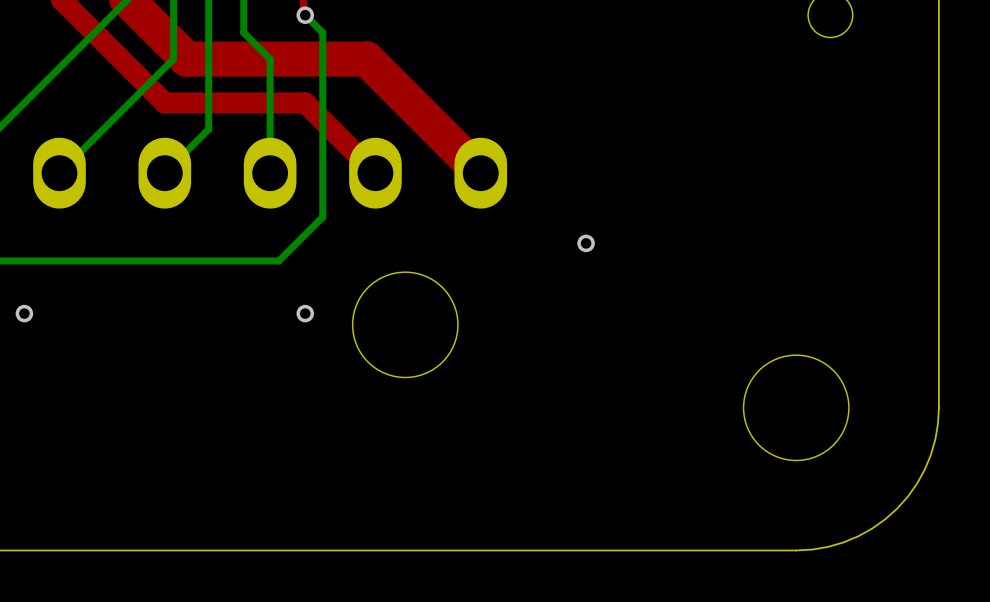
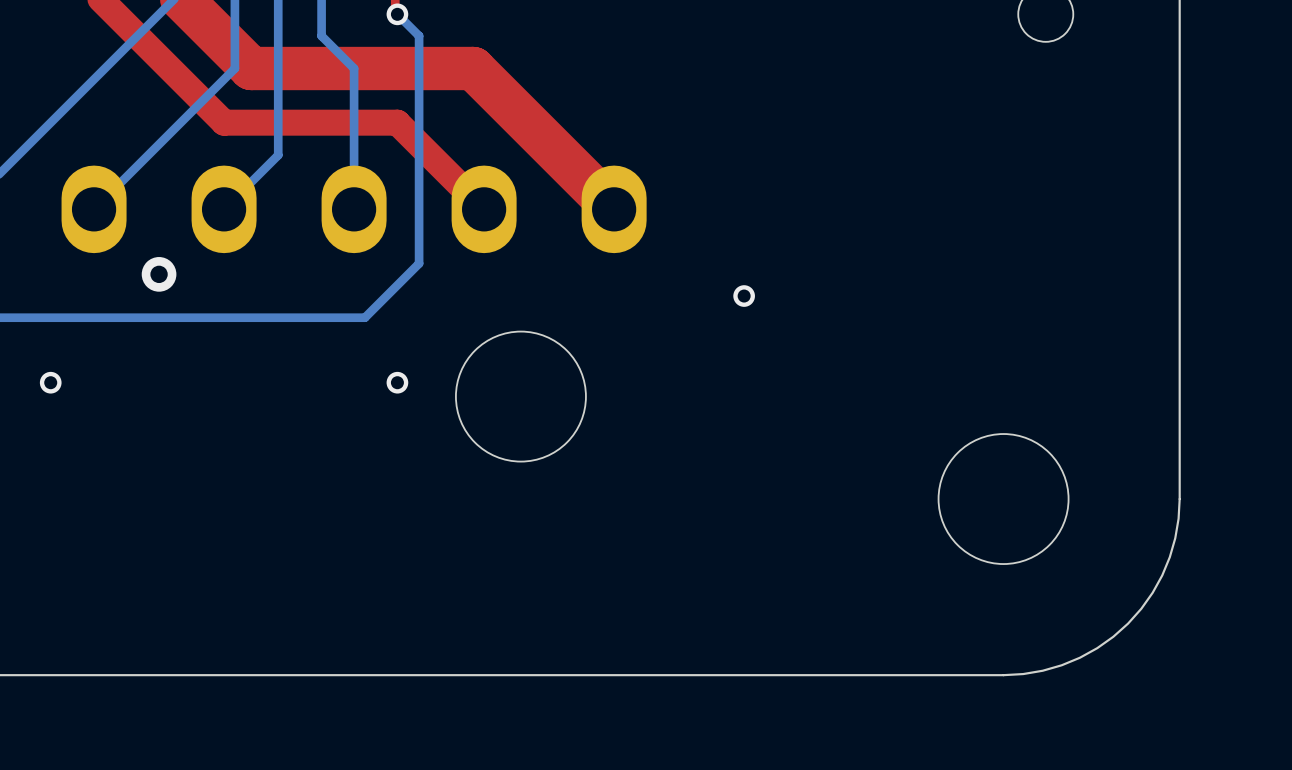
via: none -> (159, 274)

